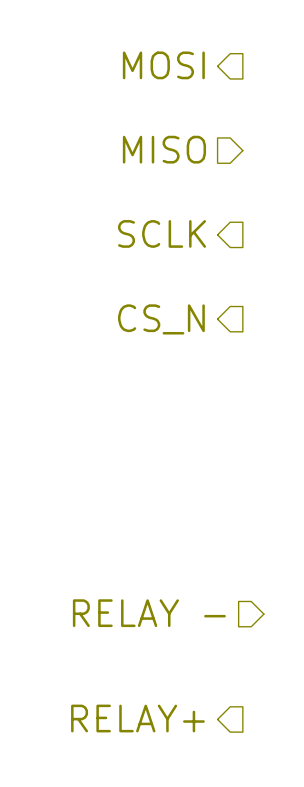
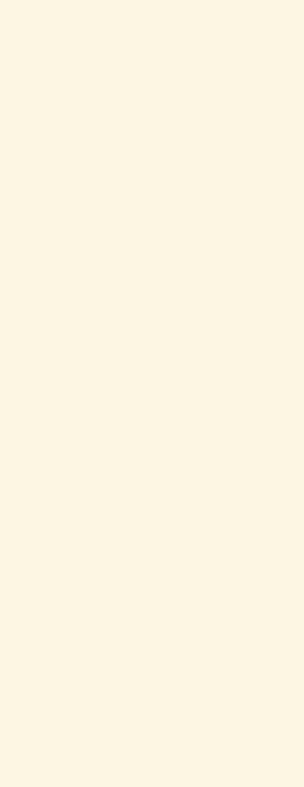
hierarchical label: MOSI (163, 65) -> none
hierarchical label: MISO (164, 149) -> none
hierarchical label: SCLK (162, 233) -> none
hierarchical label: CS_N (161, 319) -> none
hierarchical label: RELAY - (149, 613) -> none
hierarchical label: RELAY+ (137, 718) -> none

